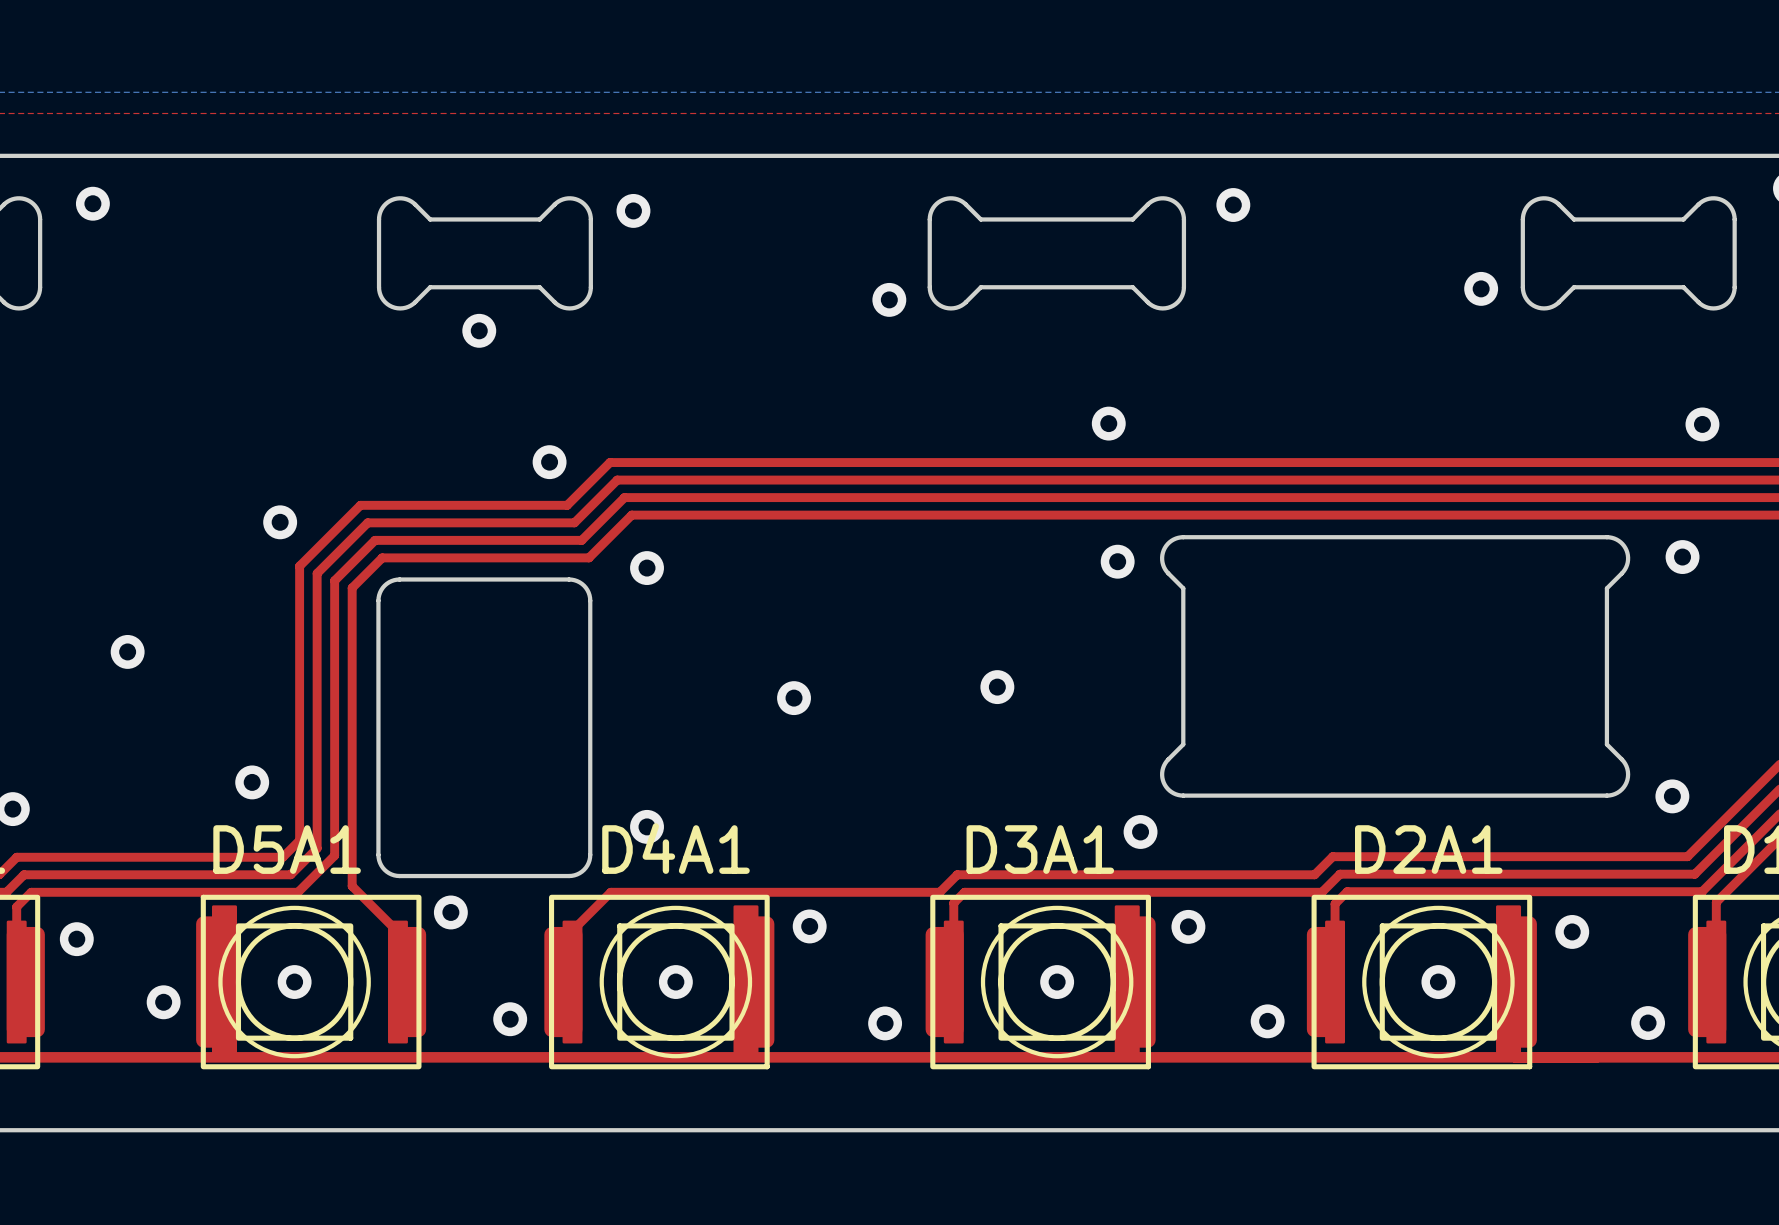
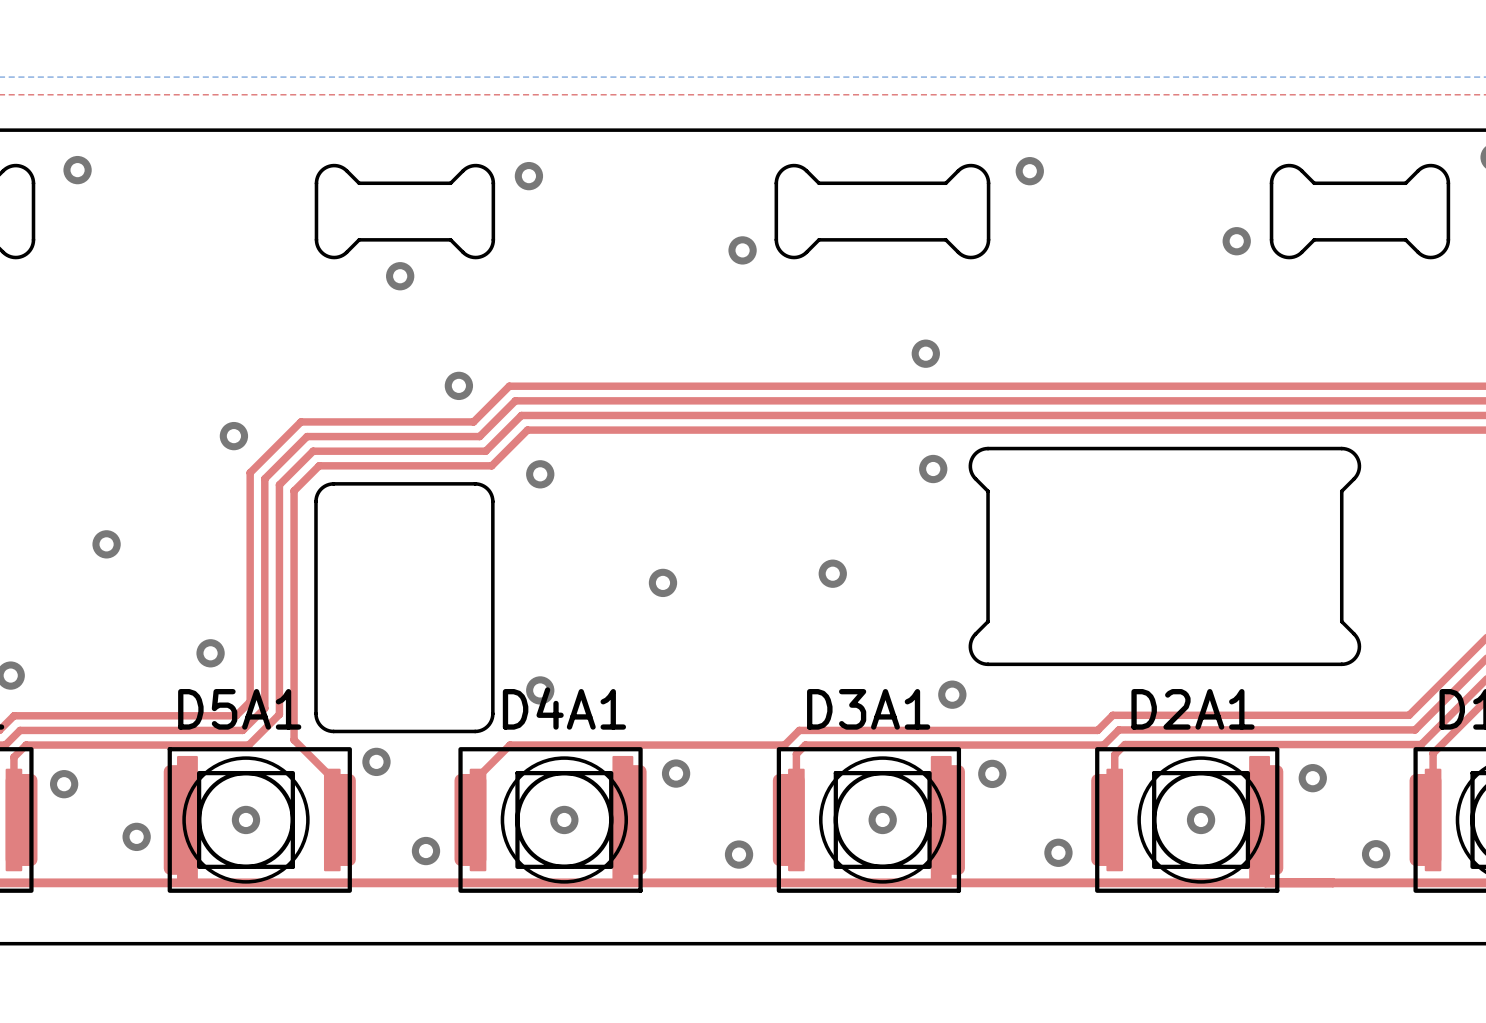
via: (1702, 424) -> none
via: (1682, 557) -> none
via: (1672, 796) -> none

